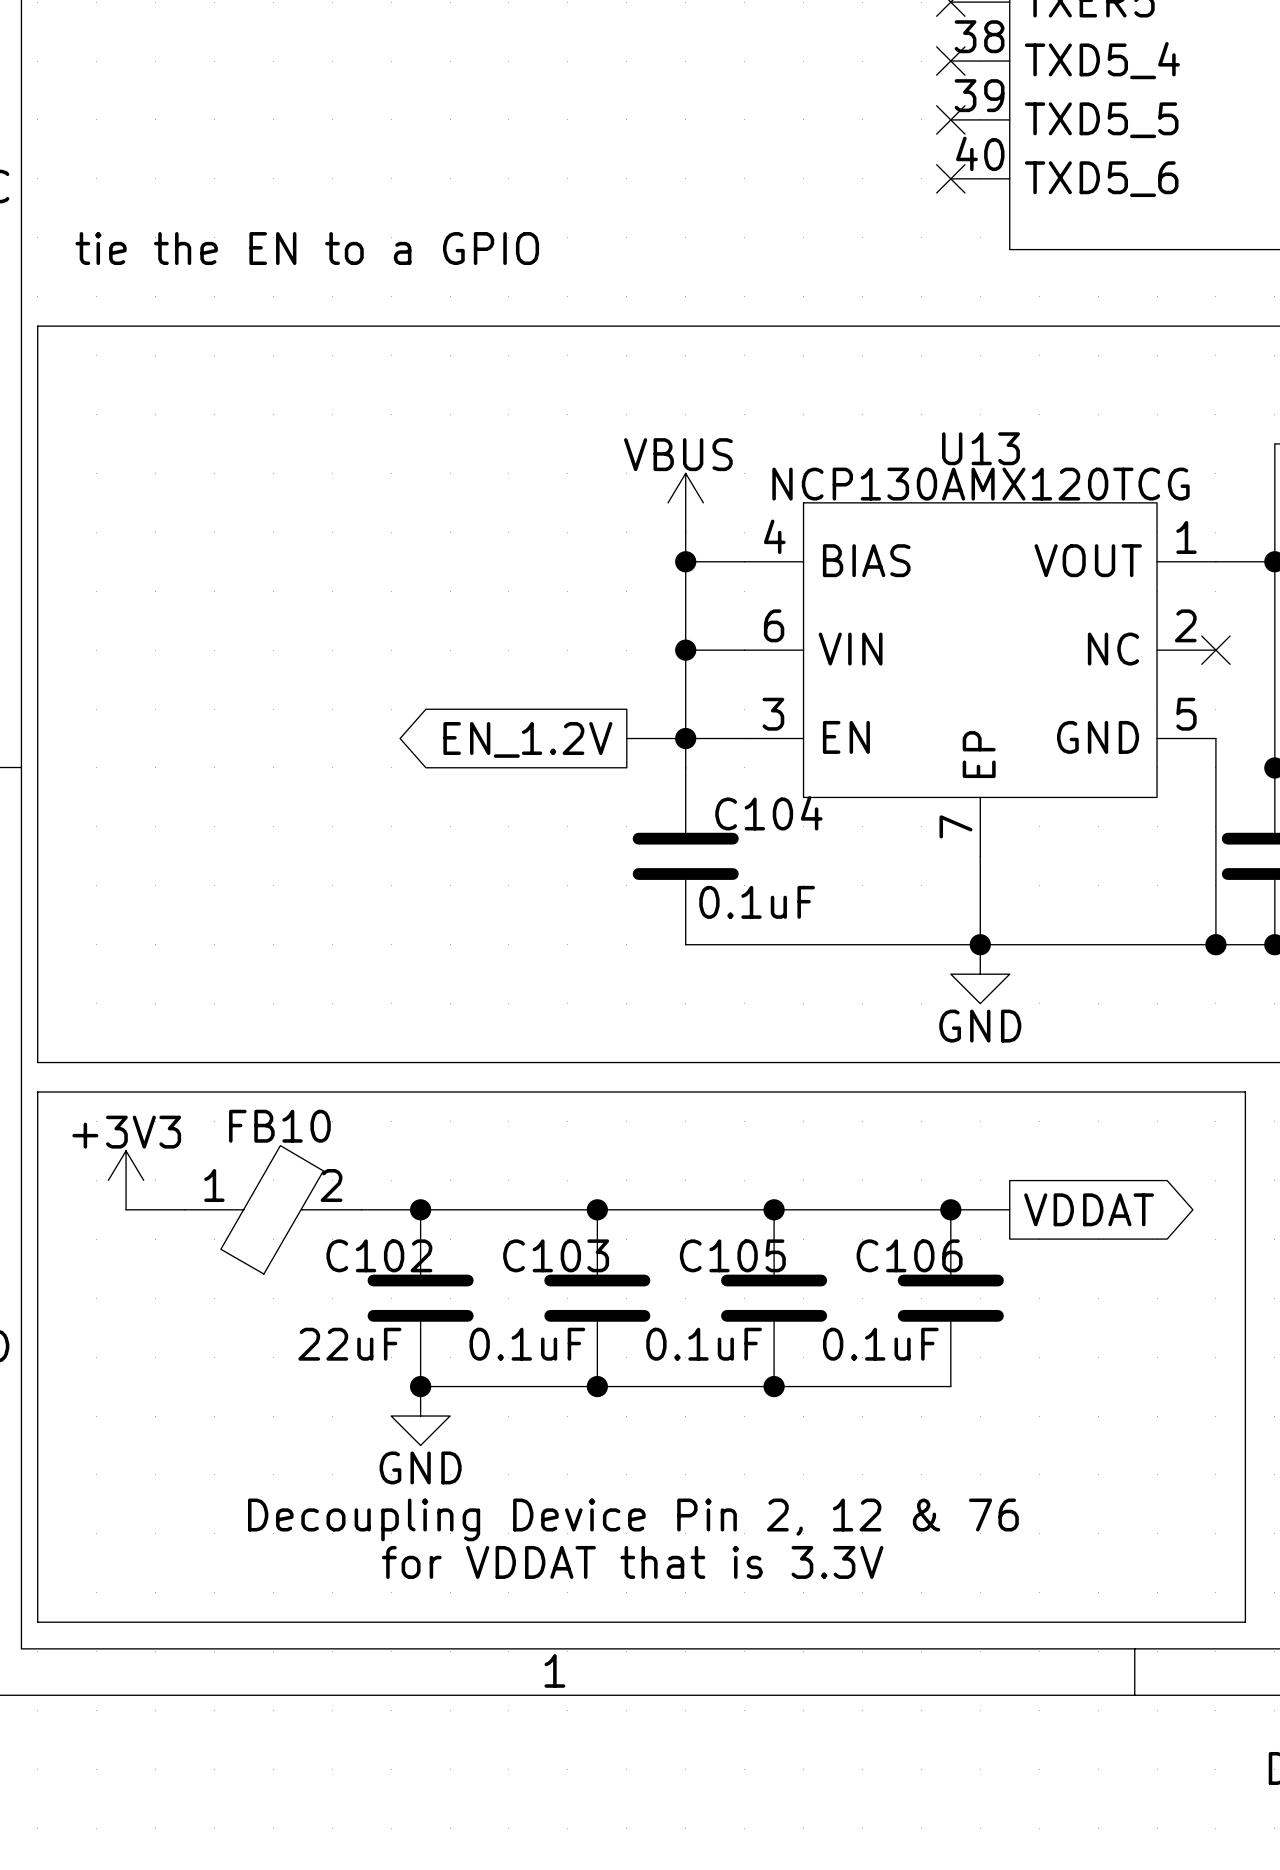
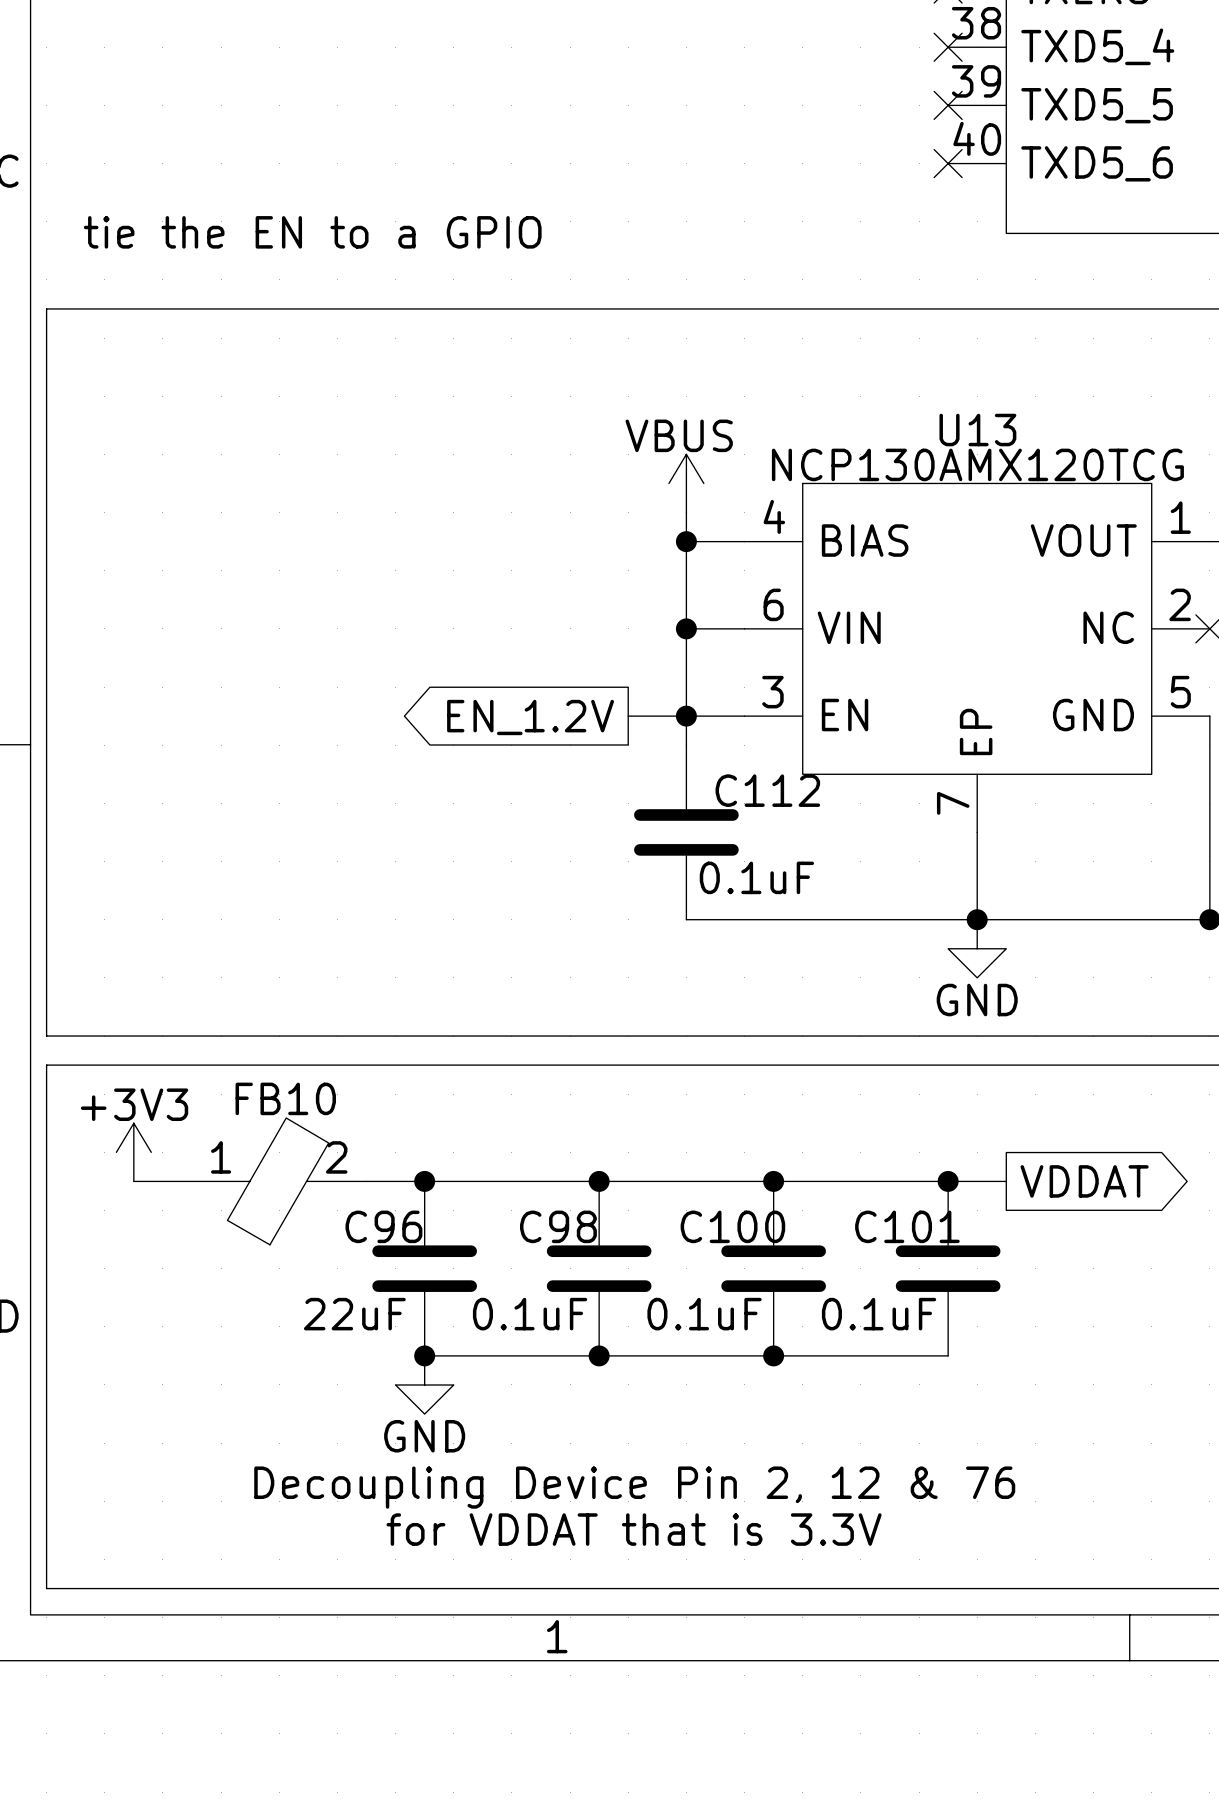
C104 name: C104 (768, 813) -> C112 (767, 790)
C102 name: C102 (379, 1255) -> C96 (383, 1226)
C103 name: C103 (556, 1255) -> C98 (558, 1226)
C105 name: C105 (732, 1255) -> C100 (732, 1226)
C106 name: C106 (909, 1255) -> C101 (907, 1226)

